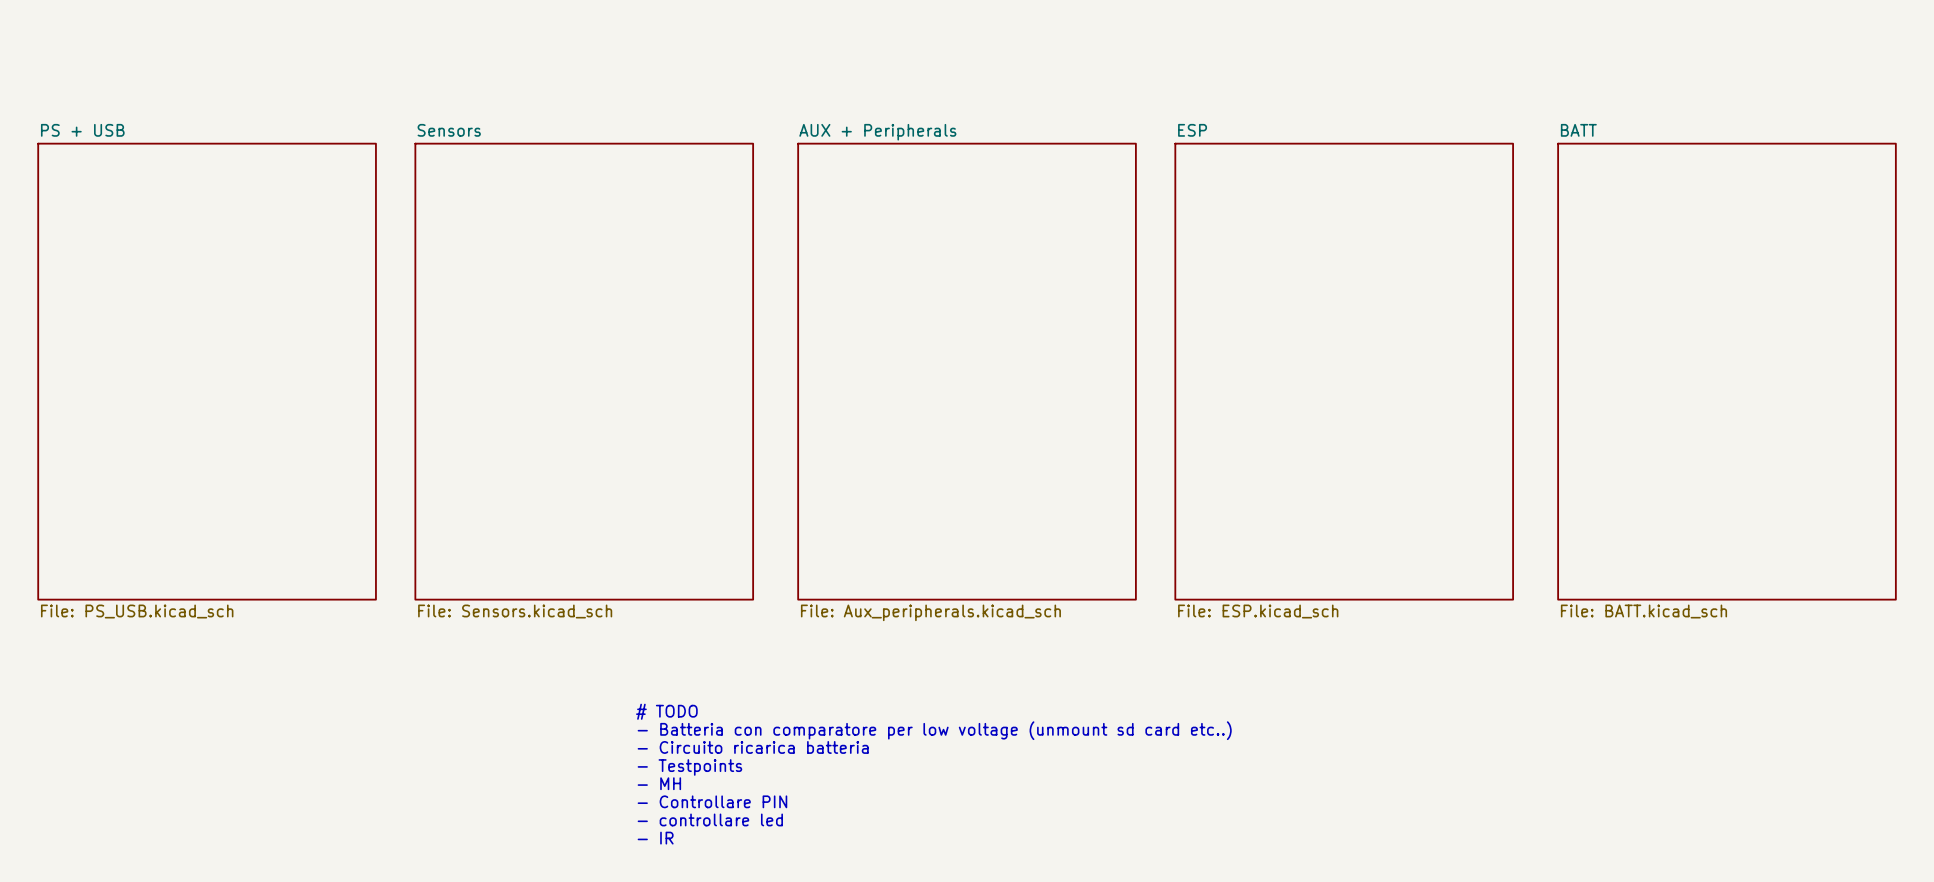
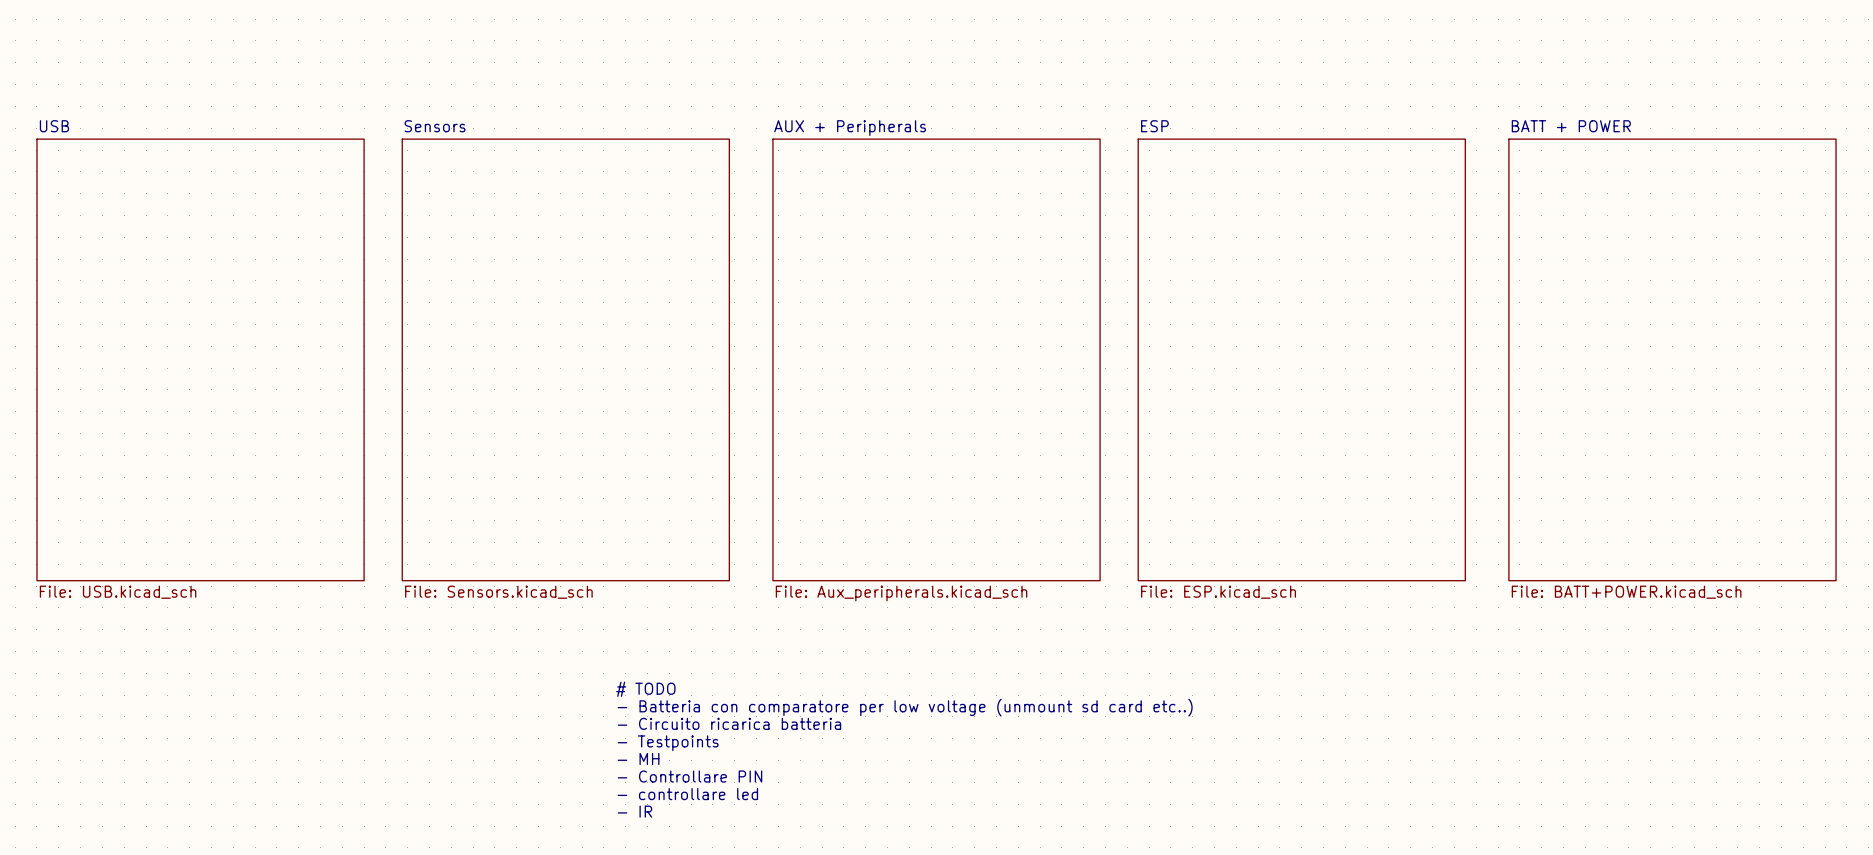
sheet PS + USB name: PS + USB (82, 130) -> USB (54, 126)
sheet BATT name: BATT (1578, 130) -> BATT + POWER (1571, 126)
sheet PS + USB value: File: PS_USB.kicad_sch (137, 611) -> File: USB.kicad_sch (118, 592)
sheet BATT value: File: BATT.kicad_sch (1643, 611) -> File: BATT+POWER.kicad_sch (1626, 592)

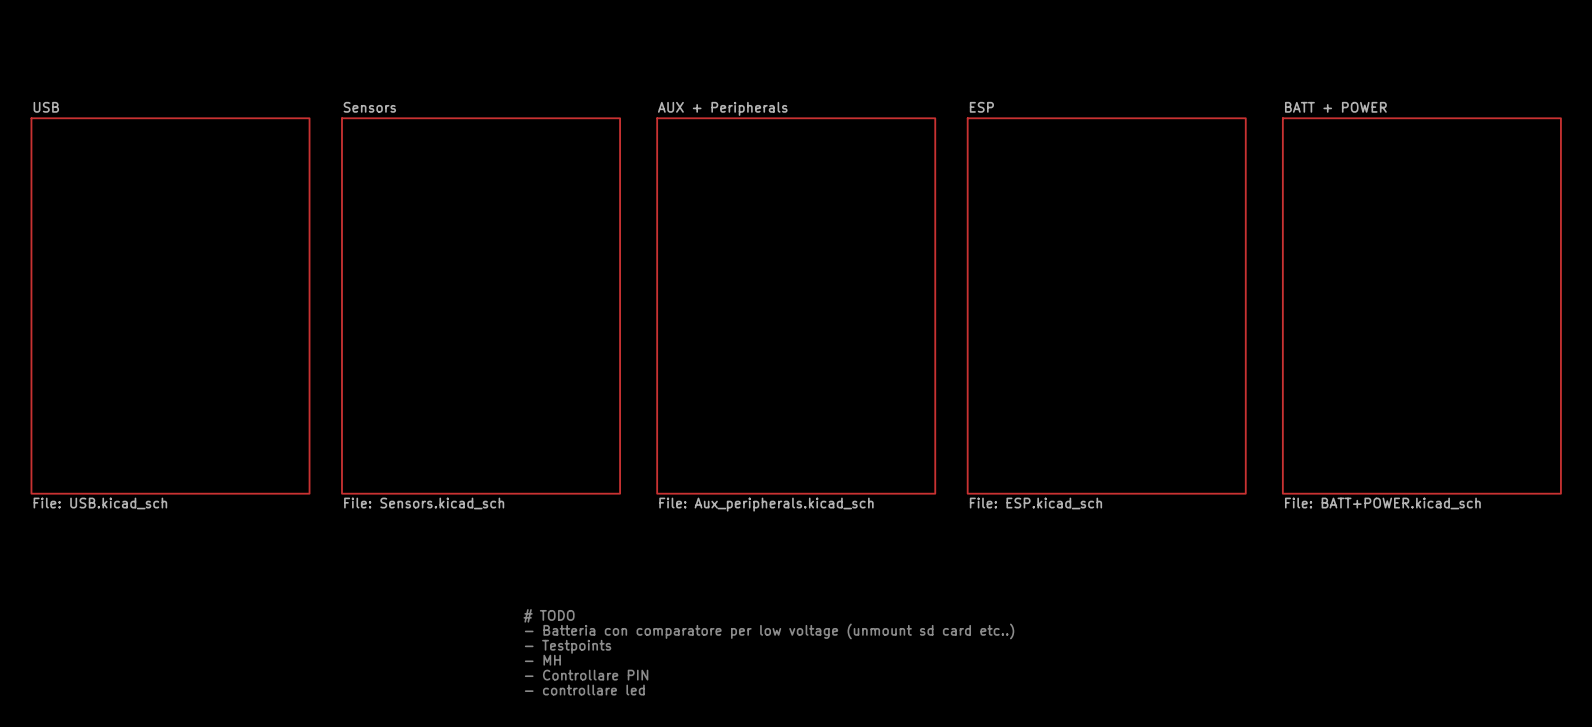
text: # TODO (645, 689) -> none
text: - Batteria con comparatore per low voltage (unmount sd card etc..) (905, 707) -> none
text: - Circuito ricarica batteria (729, 723) -> # TODO (549, 615)
text: - Testpoints (668, 743) -> - Batteria con comparatore per low voltage (unmount sd card etc..) (769, 631)
text: - MH (638, 758) -> - Testpoints (568, 646)
text: - Controllare PIN (689, 776) -> - MH (542, 660)
text: - controllare led (687, 794) -> - Controllare PIN (586, 675)
text: - IR (634, 811) -> - controllare led (584, 690)

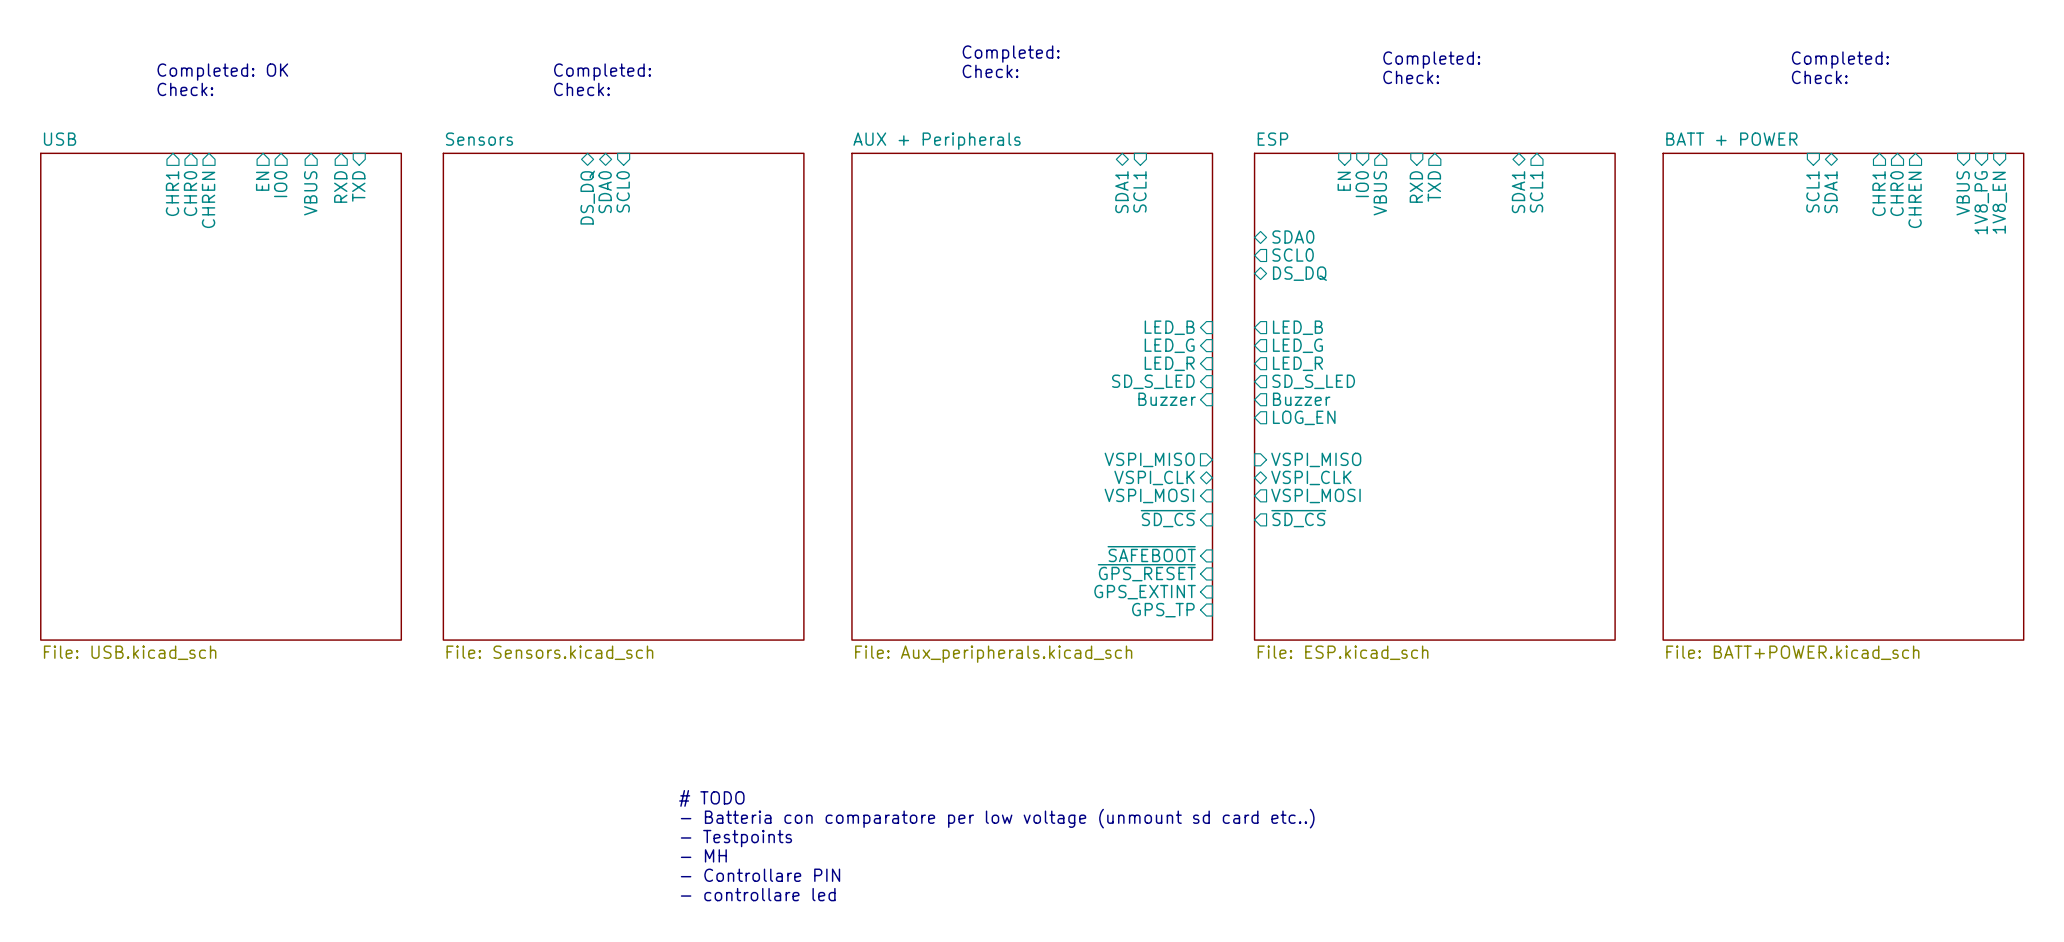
text: none -> Completed: (1011, 54)
text: none -> Completed: (1431, 60)
text: none -> Completed: (1840, 60)
text: none -> Completed: OK (222, 72)
text: none -> Completed: (602, 72)
text: none -> Check: (990, 71)
text: none -> Check: (1411, 77)
text: none -> Check: (1819, 77)
text: none -> Check: (185, 89)
text: none -> Check: (581, 89)
sheet pin: none -> EN (262, 181)
sheet pin: none -> EN (1344, 181)
sheet pin: none -> IO0 (280, 184)
sheet pin: none -> IO0 (1362, 184)
sheet pin: none -> TXD (358, 186)
sheet pin: none -> TXD (1434, 186)
sheet pin: none -> RXD (340, 187)
sheet pin: none -> RXD (1416, 187)
sheet pin: none -> SCL0 (623, 191)
sheet pin: none -> SCL1 (1139, 191)
sheet pin: none -> SCL1 (1536, 191)
sheet pin: none -> SCL1 (1812, 191)
sheet pin: none -> SDA0 (605, 192)
sheet pin: none -> SDA1 (1121, 192)
sheet pin: none -> SDA1 (1518, 192)
sheet pin: none -> SDA1 (1830, 192)
sheet pin: none -> CHR1 (172, 193)
sheet pin: none -> CHR0 (190, 193)
sheet pin: none -> VBUS (310, 193)
sheet pin: none -> VBUS (1380, 193)
sheet pin: none -> CHR1 (1879, 193)
sheet pin: none -> CHR0 (1897, 193)
sheet pin: none -> VBUS (1963, 193)
sheet pin: none -> DS_DQ (587, 197)
sheet pin: none -> CHREN (208, 199)
sheet pin: none -> CHREN (1915, 199)
sheet pin: none -> 1V8_PG (1981, 202)
sheet pin: none -> 1V8_EN (1999, 202)
sheet pin: none -> SDA0 (1293, 237)
sheet pin: none -> SCL0 (1293, 255)
sheet pin: none -> DS_DQ (1299, 273)
sheet pin: none -> LED_B (1169, 327)
sheet pin: none -> LED_B (1297, 327)
sheet pin: none -> LED_G (1169, 345)
sheet pin: none -> LED_G (1297, 345)
sheet pin: none -> LED_R (1169, 363)
sheet pin: none -> LED_R (1297, 363)
sheet pin: none -> SD_S_LED (1153, 381)
sheet pin: none -> SD_S_LED (1313, 381)
sheet pin: none -> Buzzer (1167, 399)
sheet pin: none -> Buzzer (1301, 399)
sheet pin: none -> LOG_EN (1304, 417)
sheet pin: none -> VSPI_MISO (1149, 459)
sheet pin: none -> VSPI_MISO (1316, 459)
sheet pin: none -> VSPI_CLK (1154, 477)
sheet pin: none -> VSPI_CLK (1311, 477)
sheet pin: none -> VSPI_MOSI (1149, 495)
sheet pin: none -> VSPI_MOSI (1315, 495)
sheet pin: none -> ~{SD_CS} (1168, 518)
sheet pin: none -> ~{SD_CS} (1298, 518)
sheet pin: none -> ~{SAFEBOOT} (1151, 554)
sheet pin: none -> ~{GPS_RESET} (1146, 572)
sheet pin: none -> GPS_EXTINT (1145, 592)
sheet pin: none -> GPS_TP (1163, 610)

